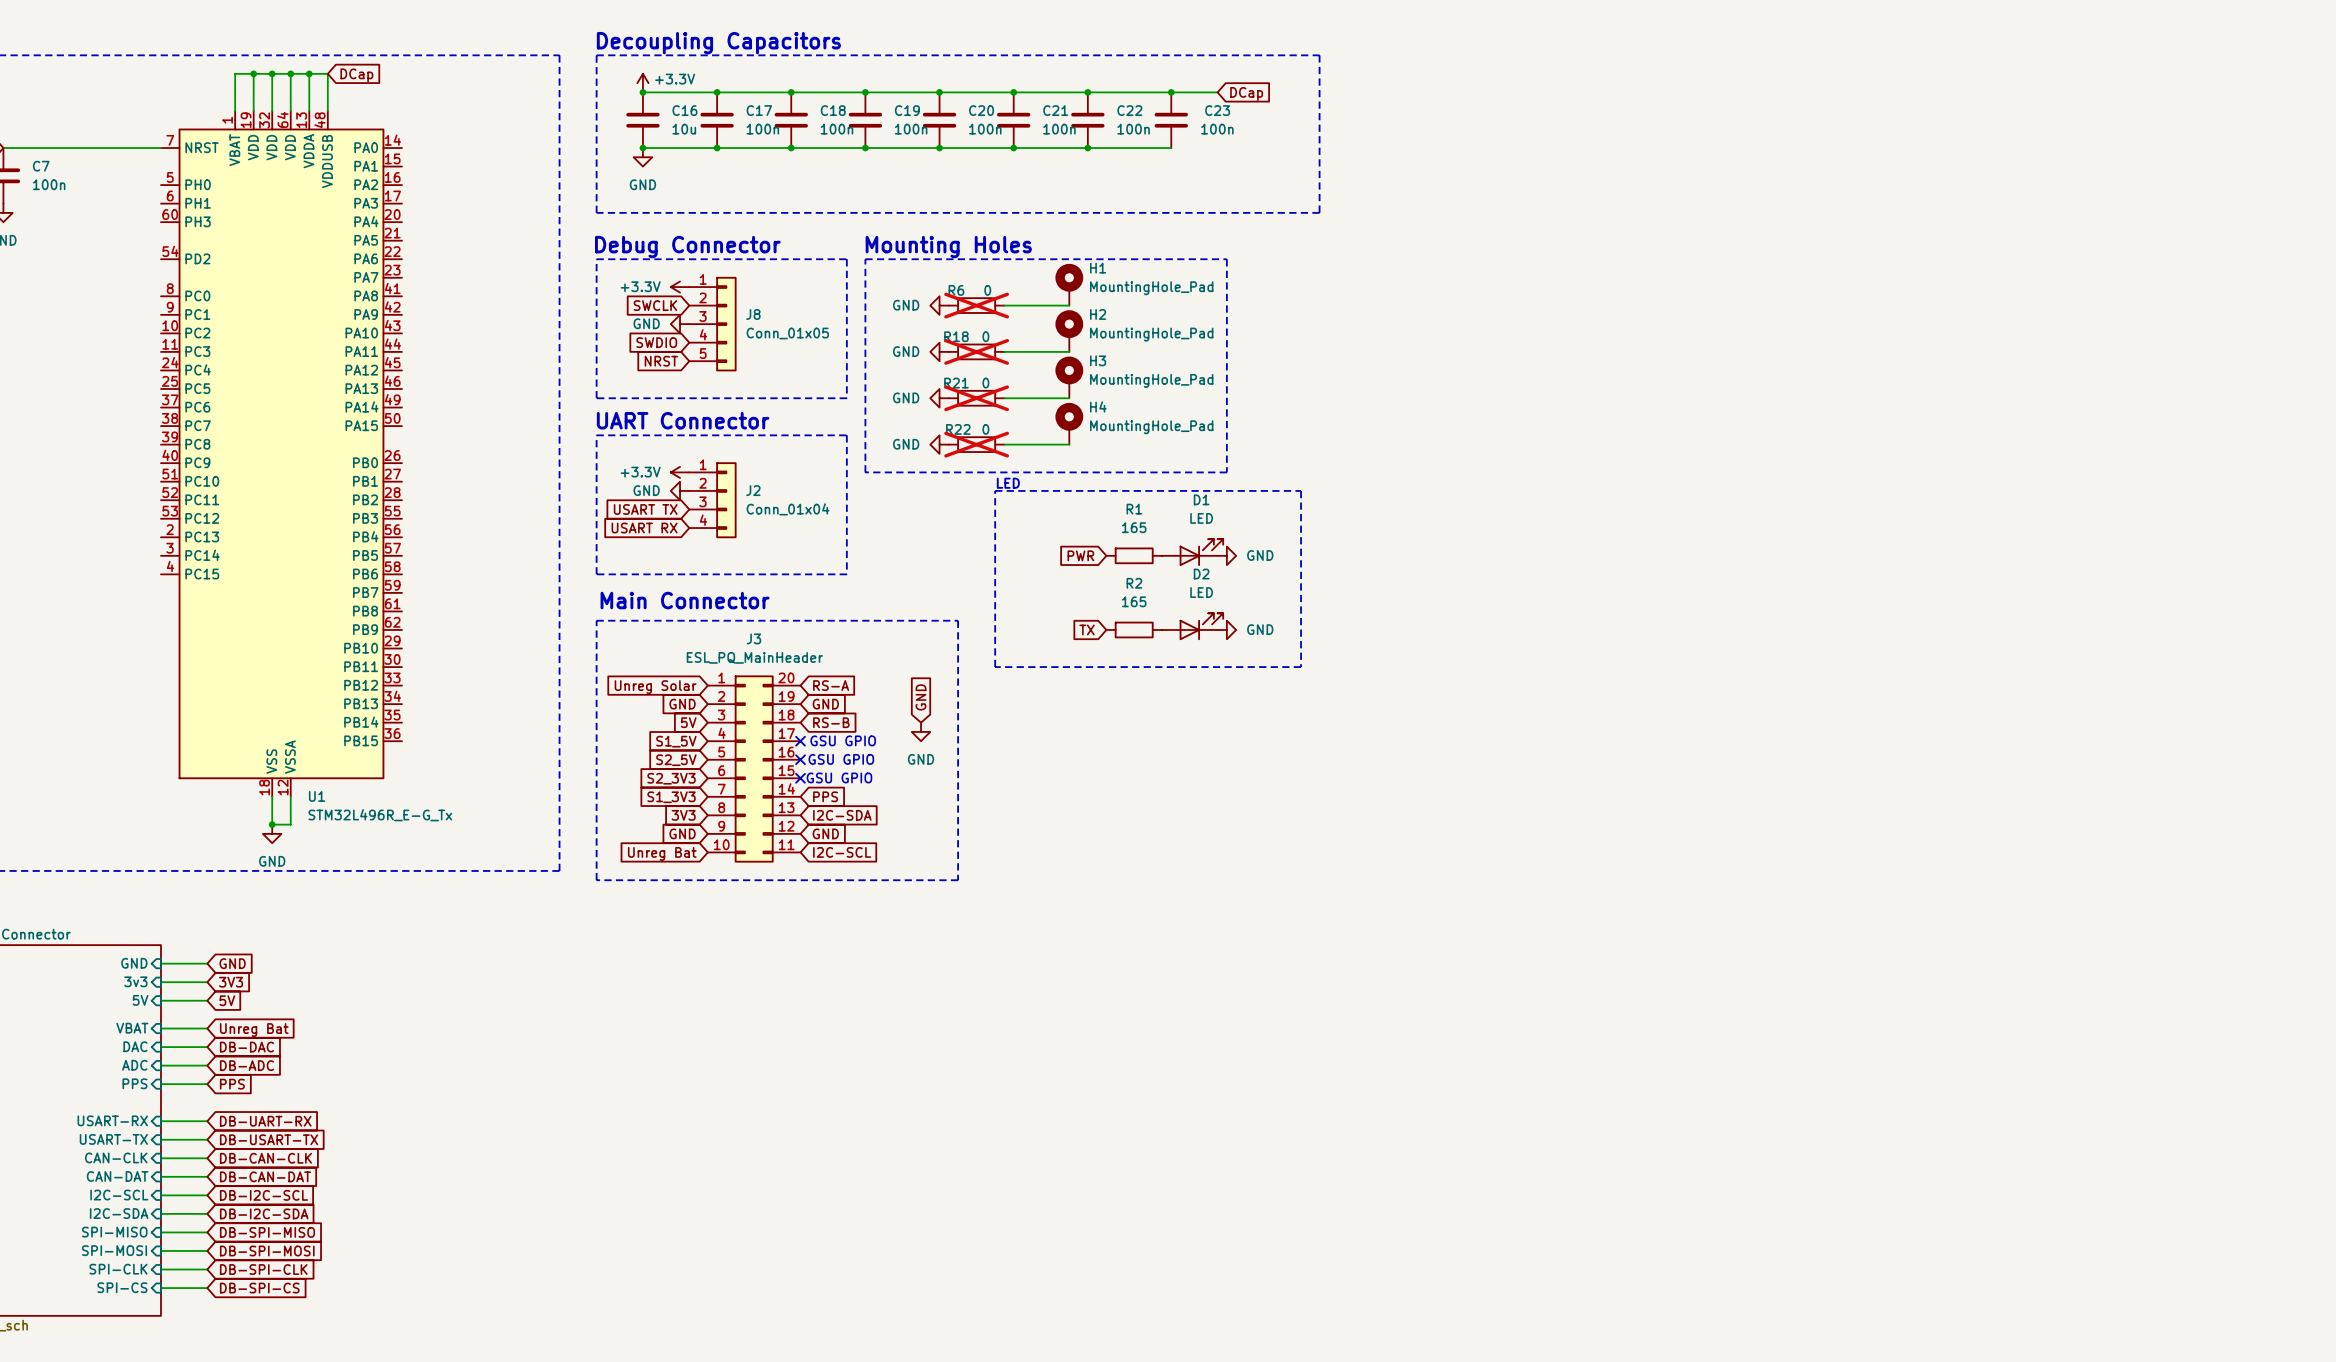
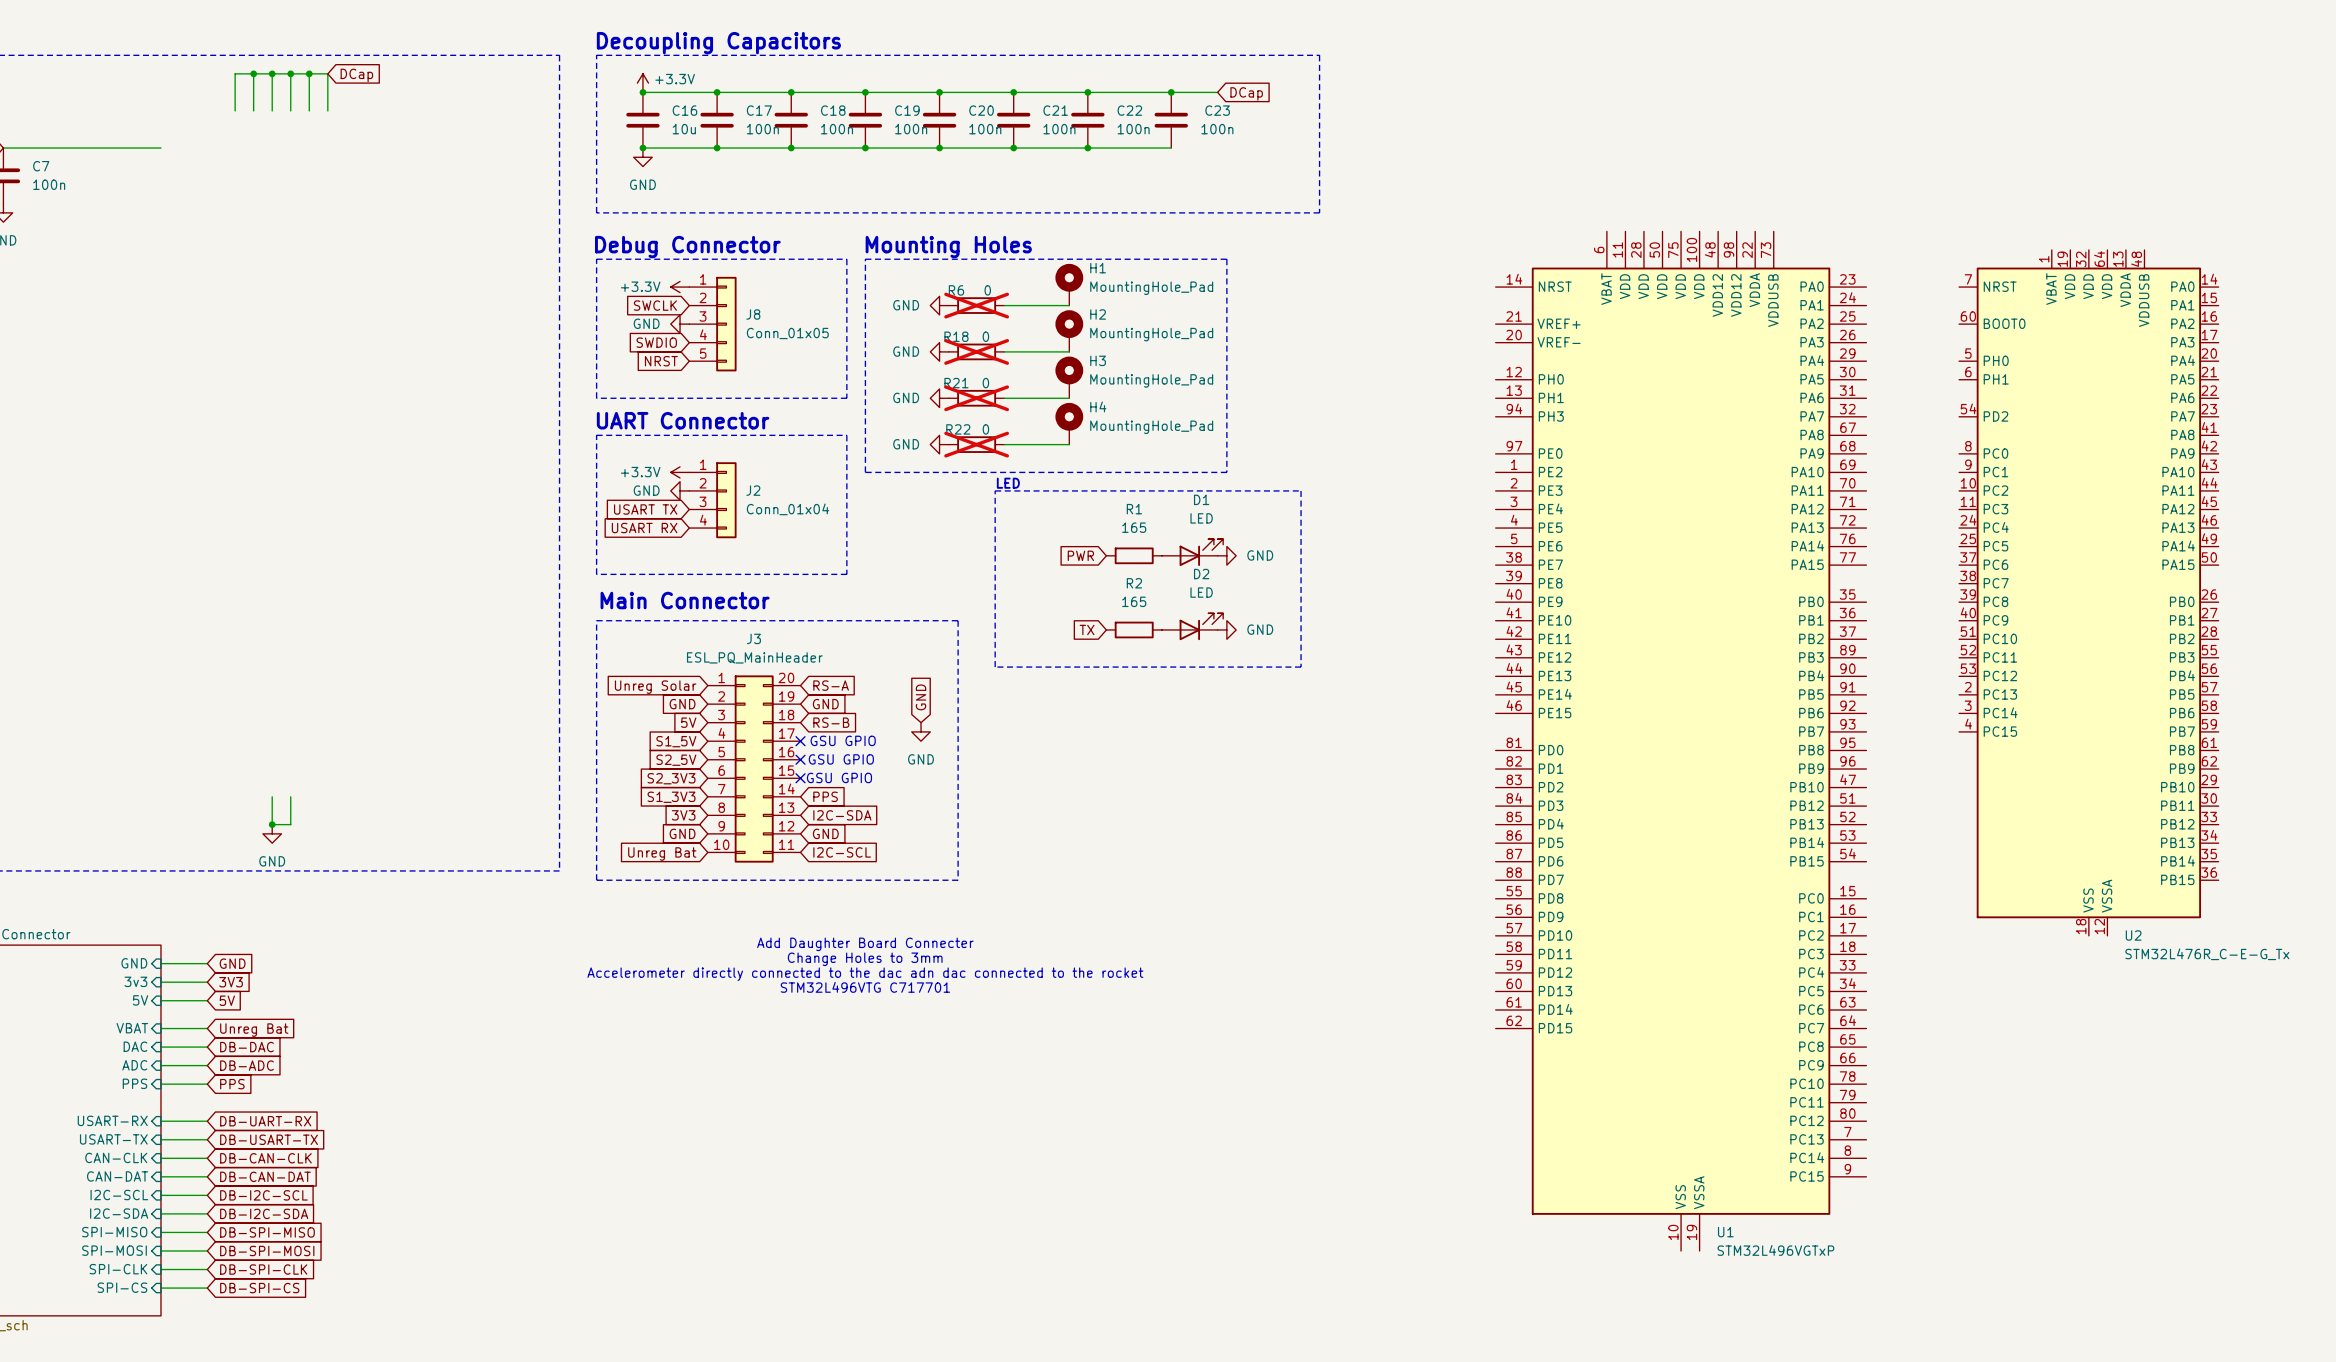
U1 symbol: [160, 110, 402, 797] -> [1495, 231, 1867, 1251]
U2: none -> STM32L476R_C-E-G_Tx (2088, 592)
U1 name position: U1 (316, 796) -> U1 (1725, 1232)
U1 value: STM32L496R_E-G_Tx (380, 815) -> STM32L496VGTxP (1775, 1250)
text: none -> Add Daughter Board Connecter (865, 944)
text: none -> Change Holes to 3mm (865, 959)
text: none -> Accelerometer directly connected to the dac adn dac connected to the rocket (865, 974)
text: none -> STM32L496VTG C717701 (865, 987)

